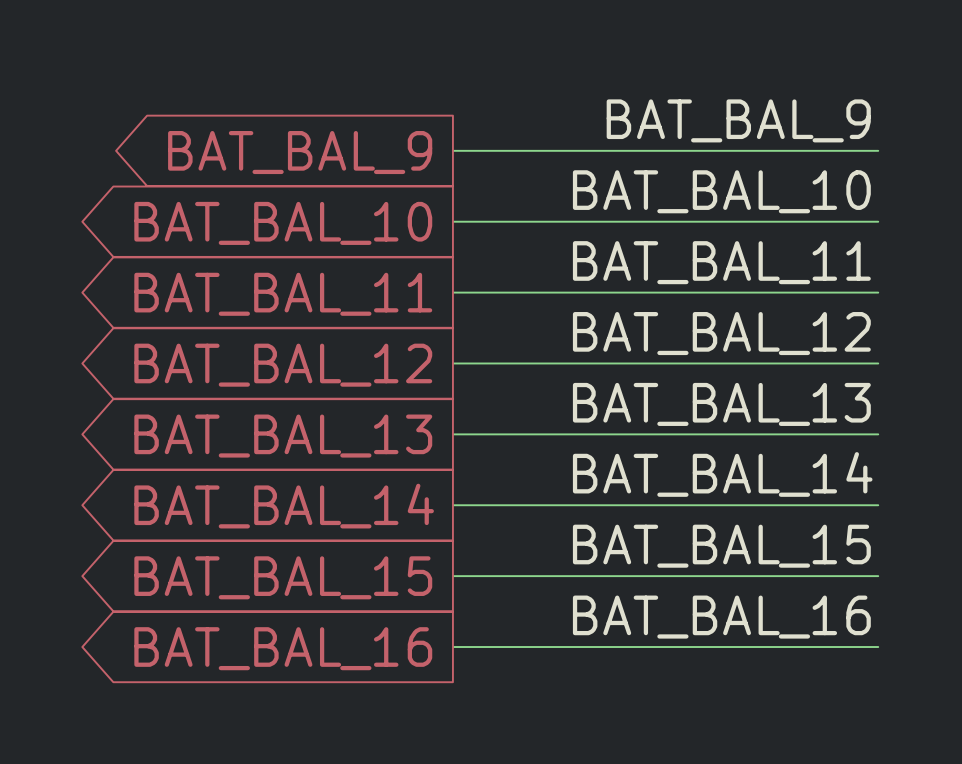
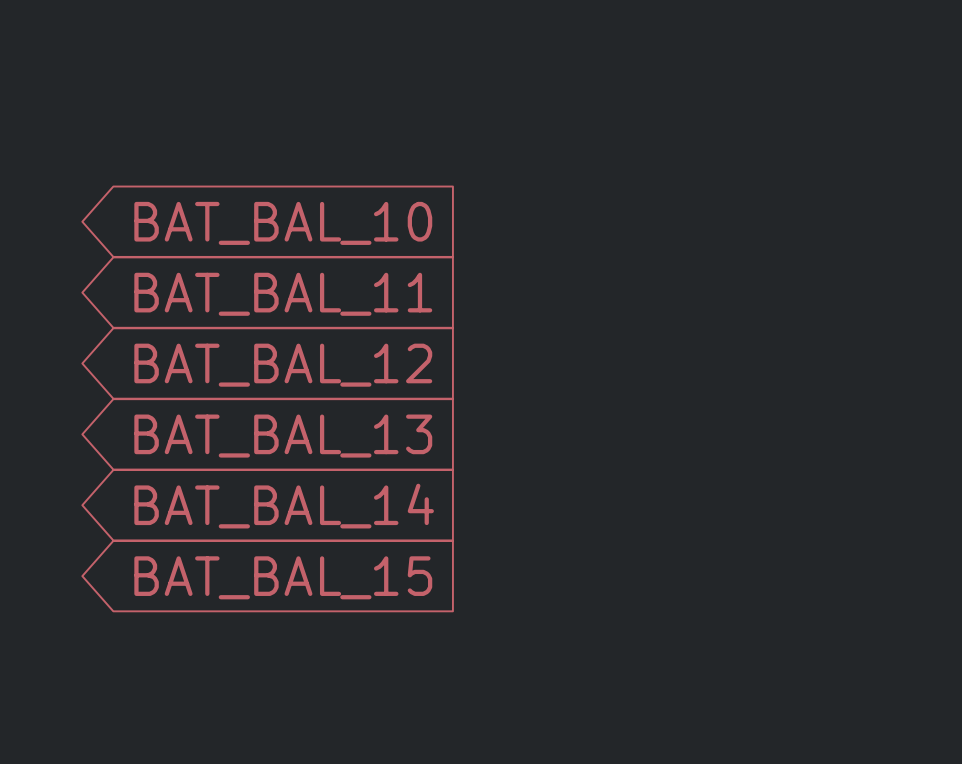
label: BAT_BAL_9 (738, 120) -> none
wire: (452, 150) (878, 150) -> none
global label: BAT_BAL_9 (300, 152) -> none
label: BAT_BAL_10 (721, 191) -> none
wire: (452, 221) (878, 221) -> none
label: BAT_BAL_11 (721, 262) -> none
wire: (452, 292) (878, 292) -> none
label: BAT_BAL_12 (721, 333) -> none
wire: (452, 363) (878, 363) -> none
label: BAT_BAL_13 (721, 404) -> none
wire: (452, 434) (878, 434) -> none
label: BAT_BAL_14 (722, 474) -> none
wire: (452, 505) (878, 505) -> none
label: BAT_BAL_15 (721, 546) -> none
wire: (452, 576) (878, 576) -> none
label: BAT_BAL_16 (721, 617) -> none
wire: (452, 647) (878, 647) -> none
global label: BAT_BAL_16 (283, 648) -> none

